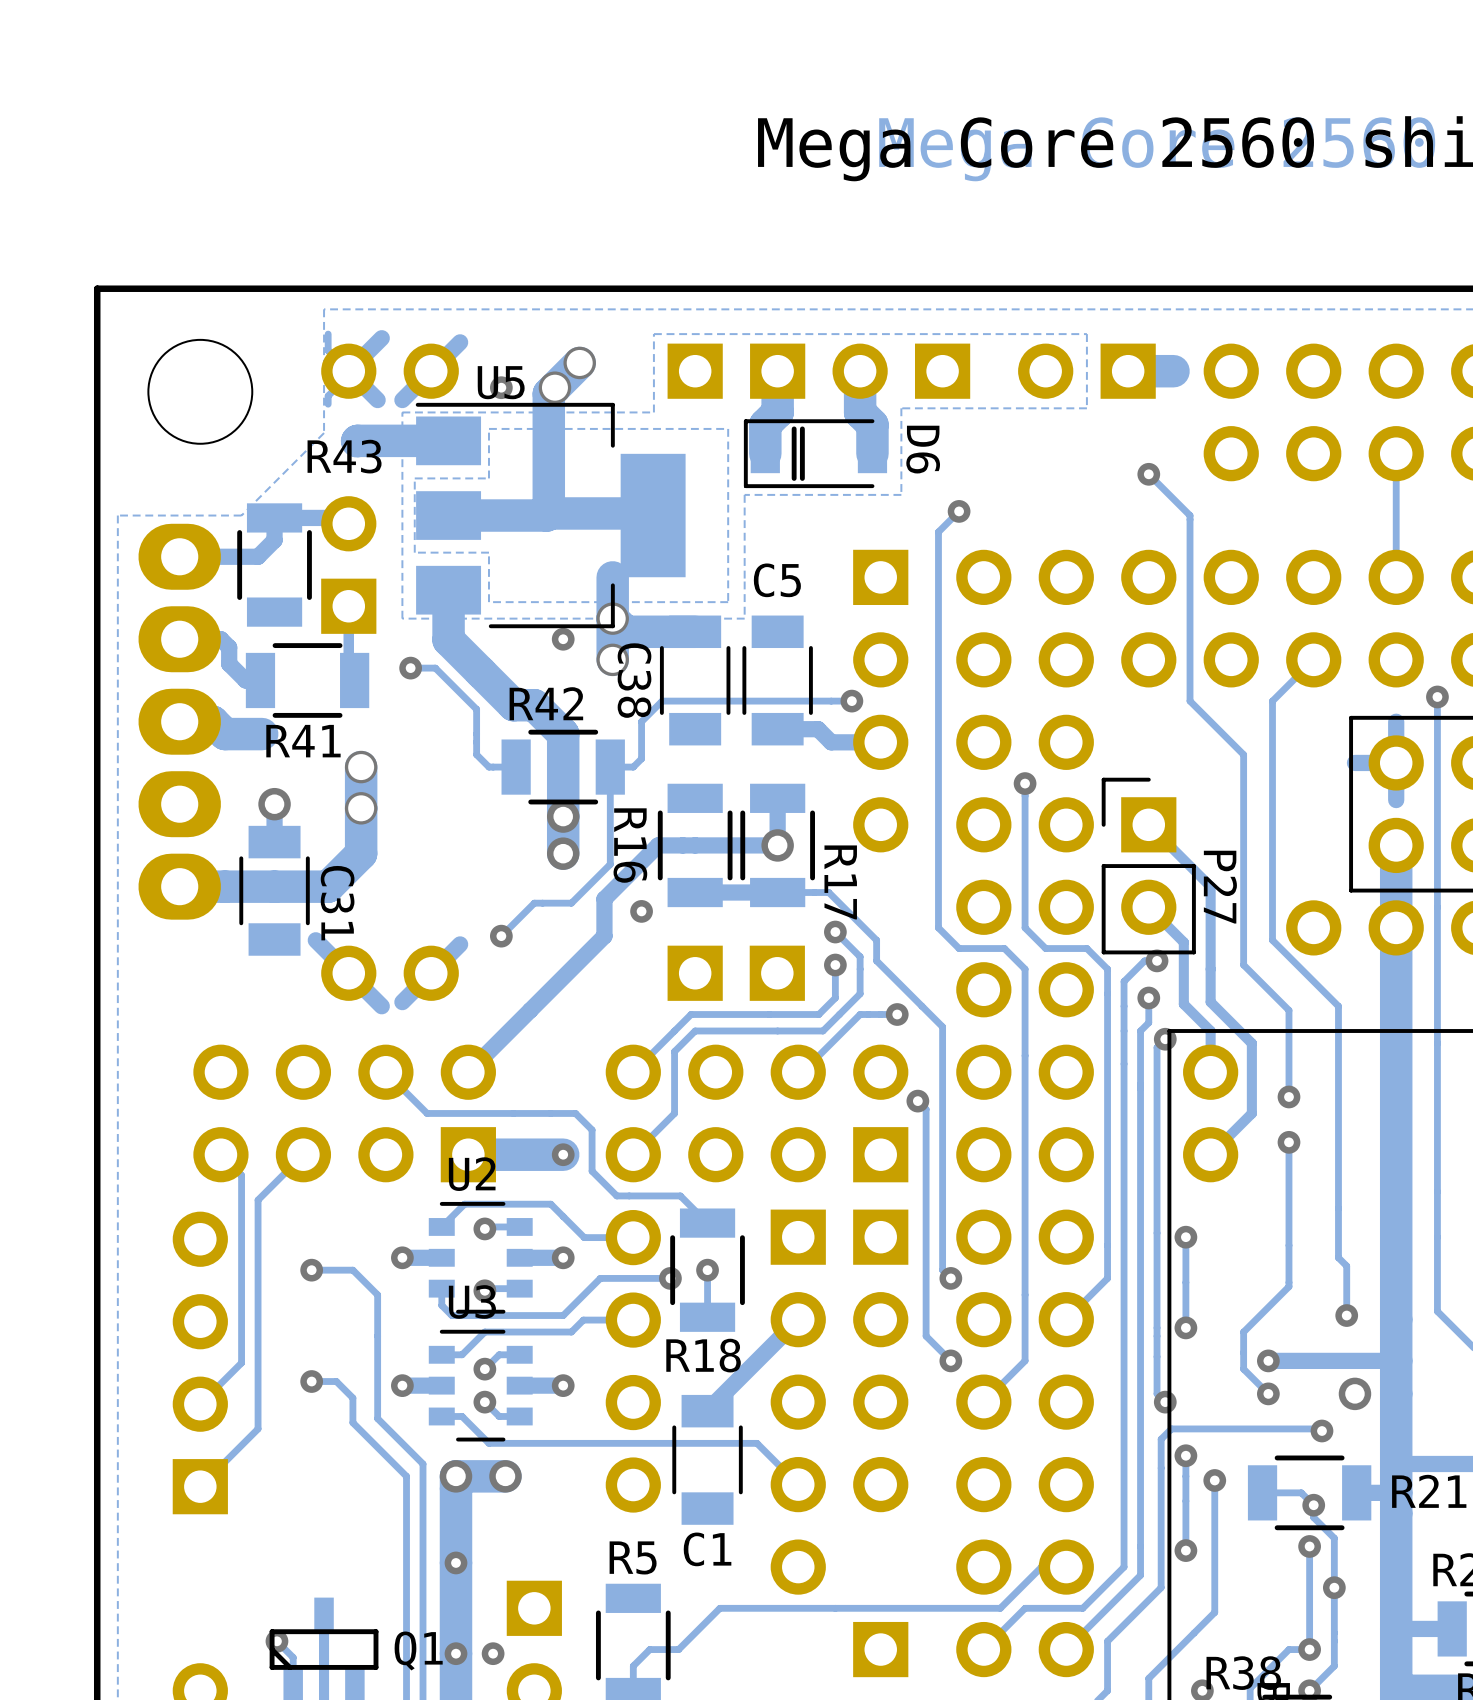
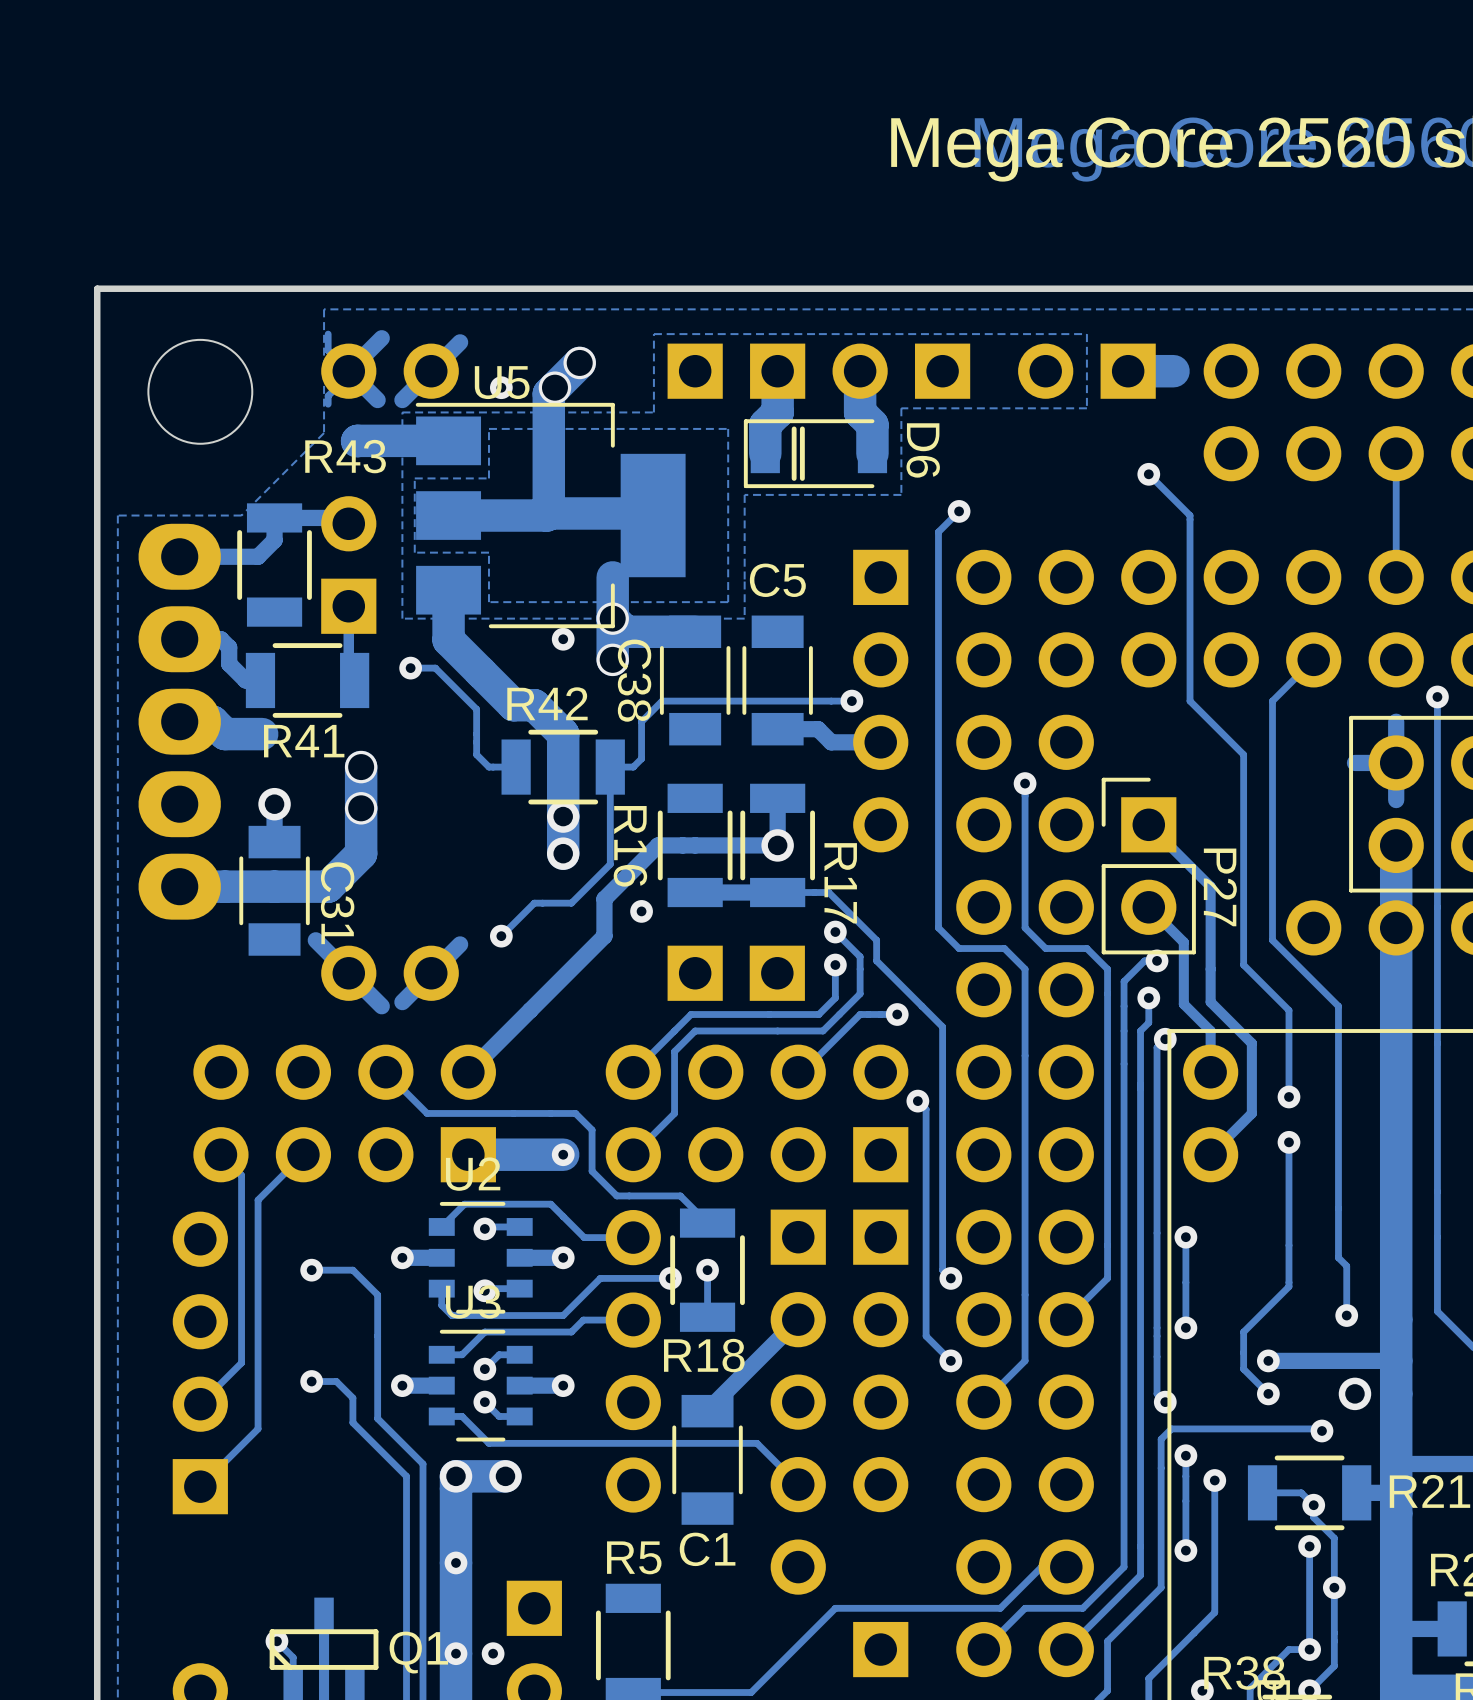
track: (835, 1608) (719, 1608) (678, 1649) (649, 1649) (633, 1666) (633, 1692) -> (835, 1608) (751, 1692) (633, 1692)

